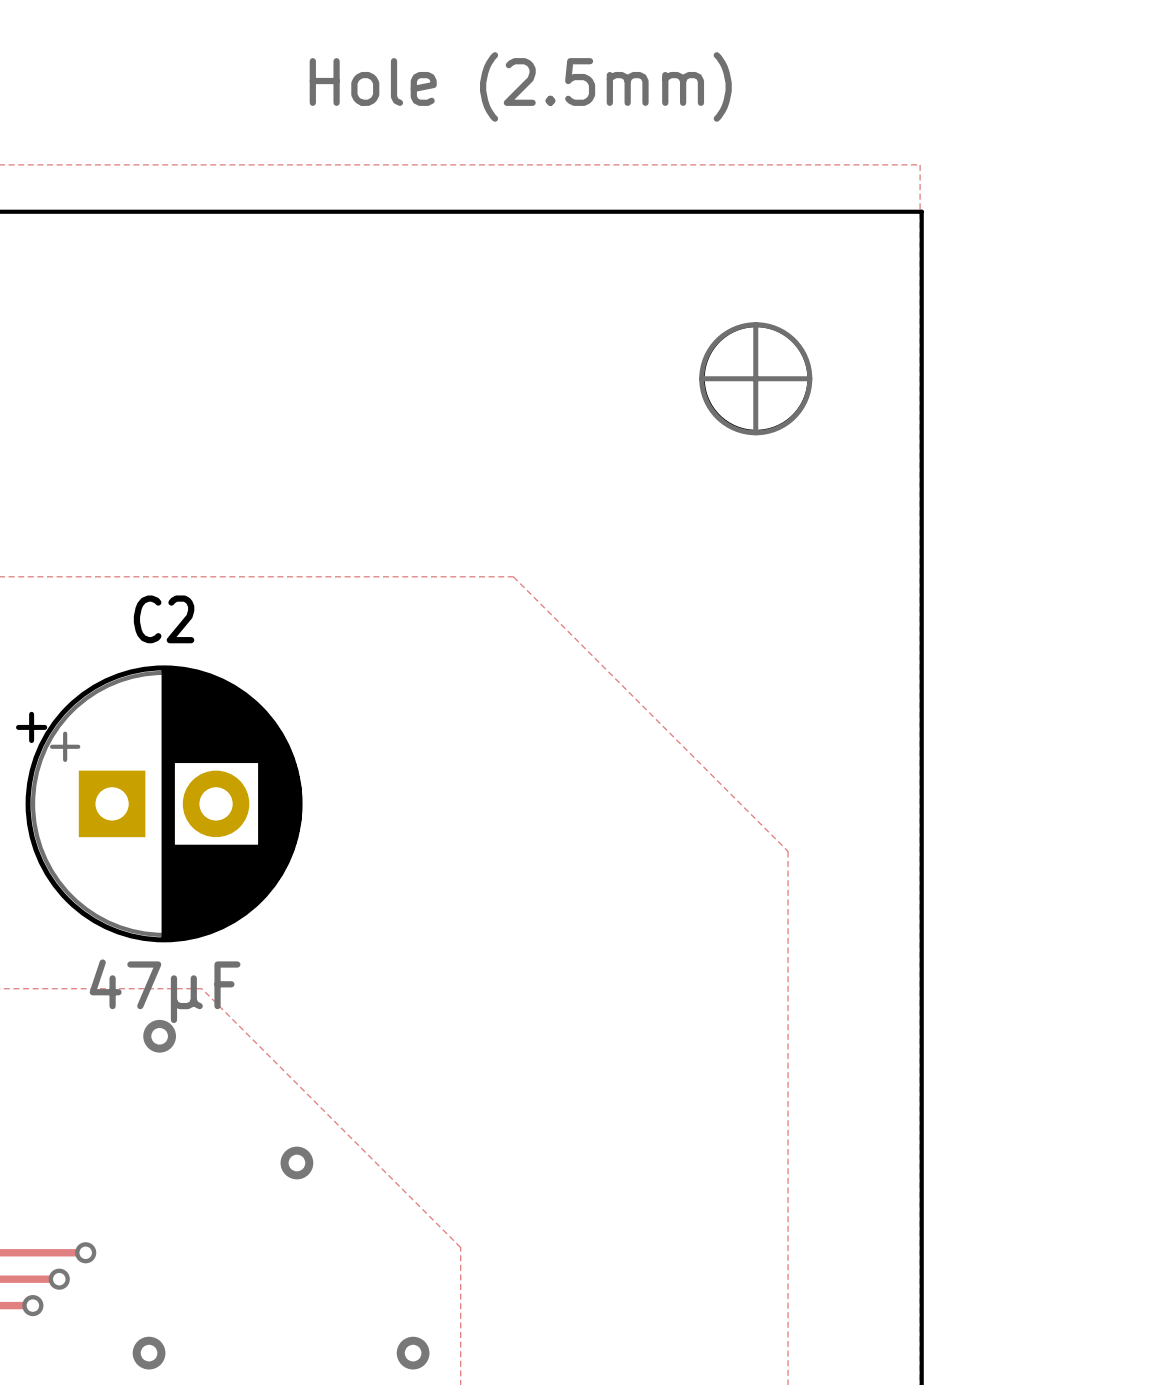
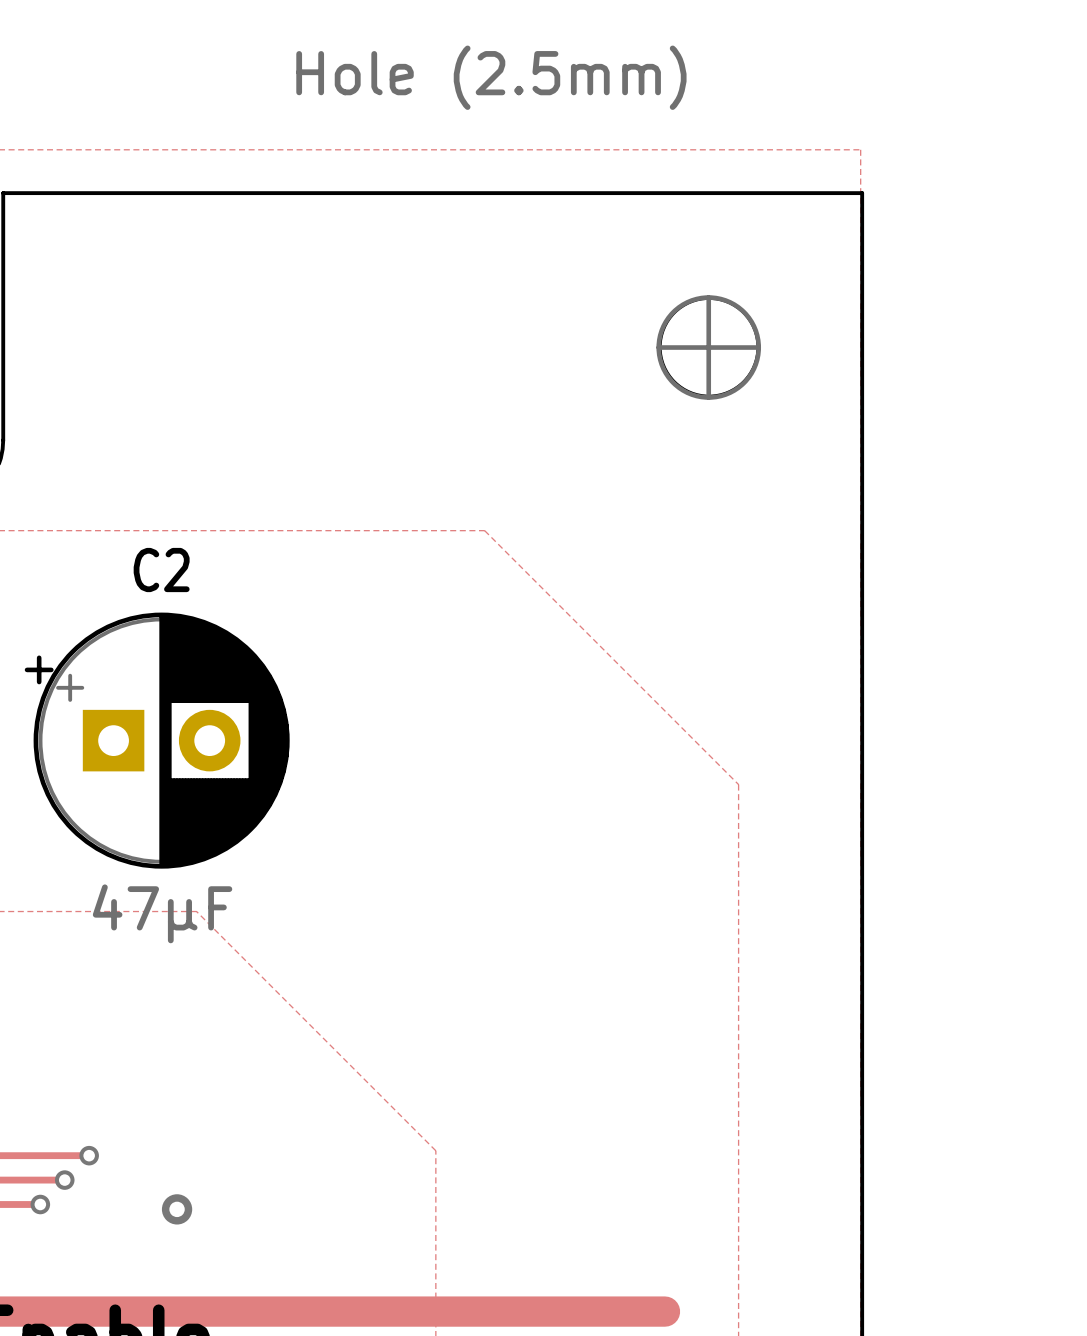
via: (159, 1036) -> none
via: (296, 1163) -> none
via position: (149, 1353) -> (177, 1209)
via: (413, 1353) -> none

